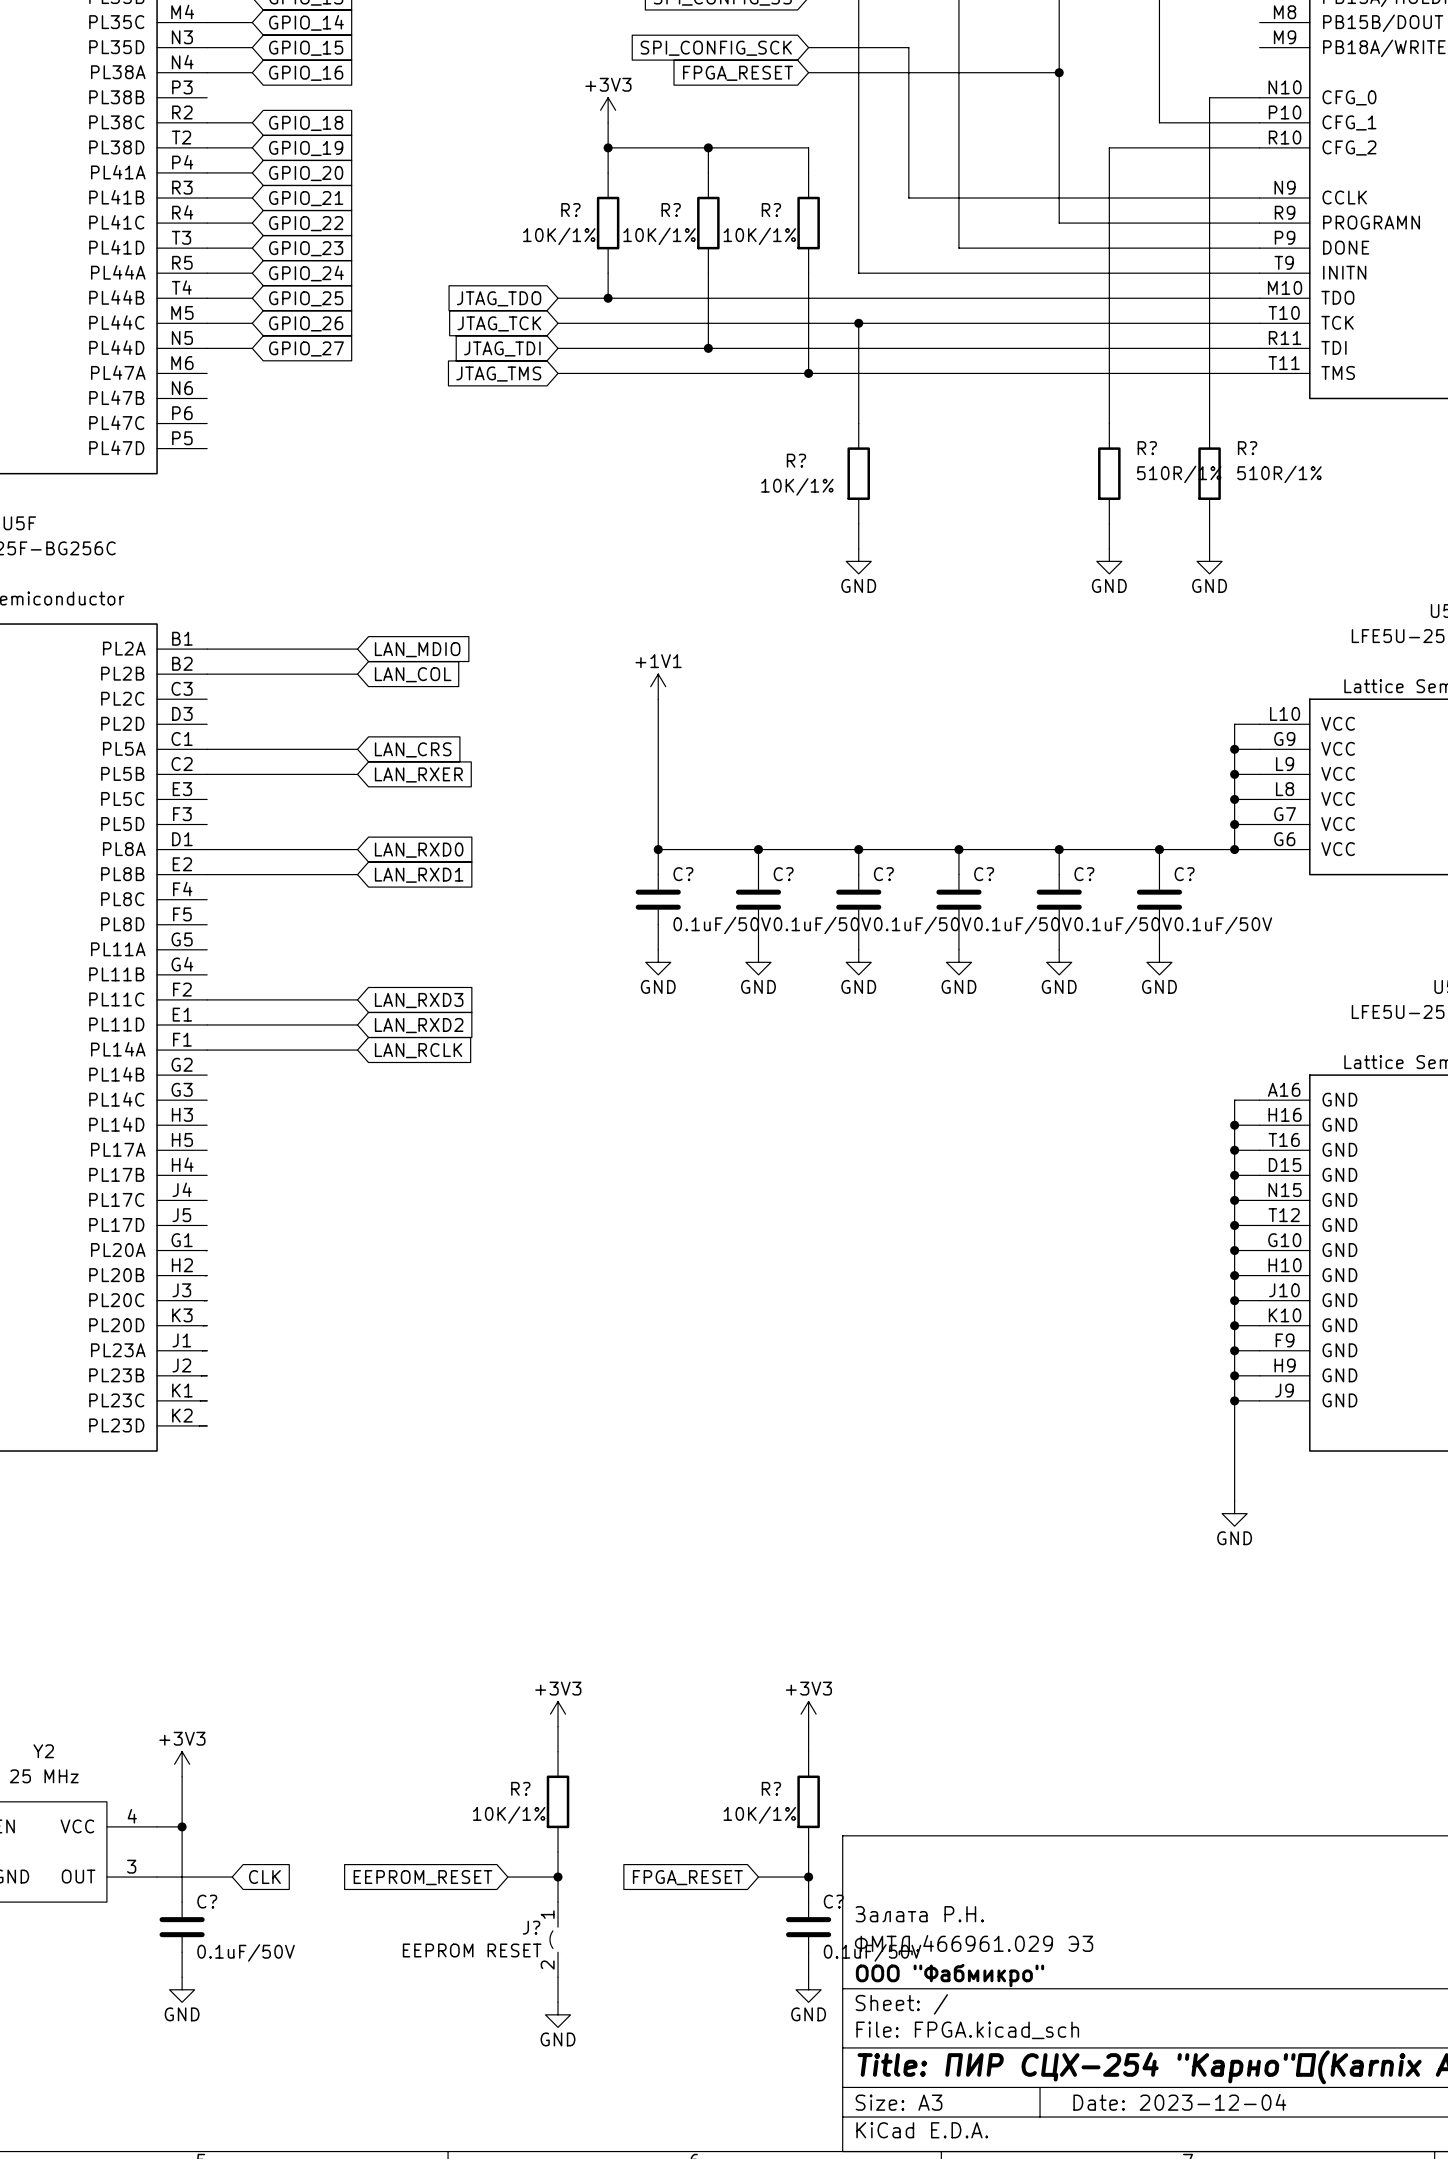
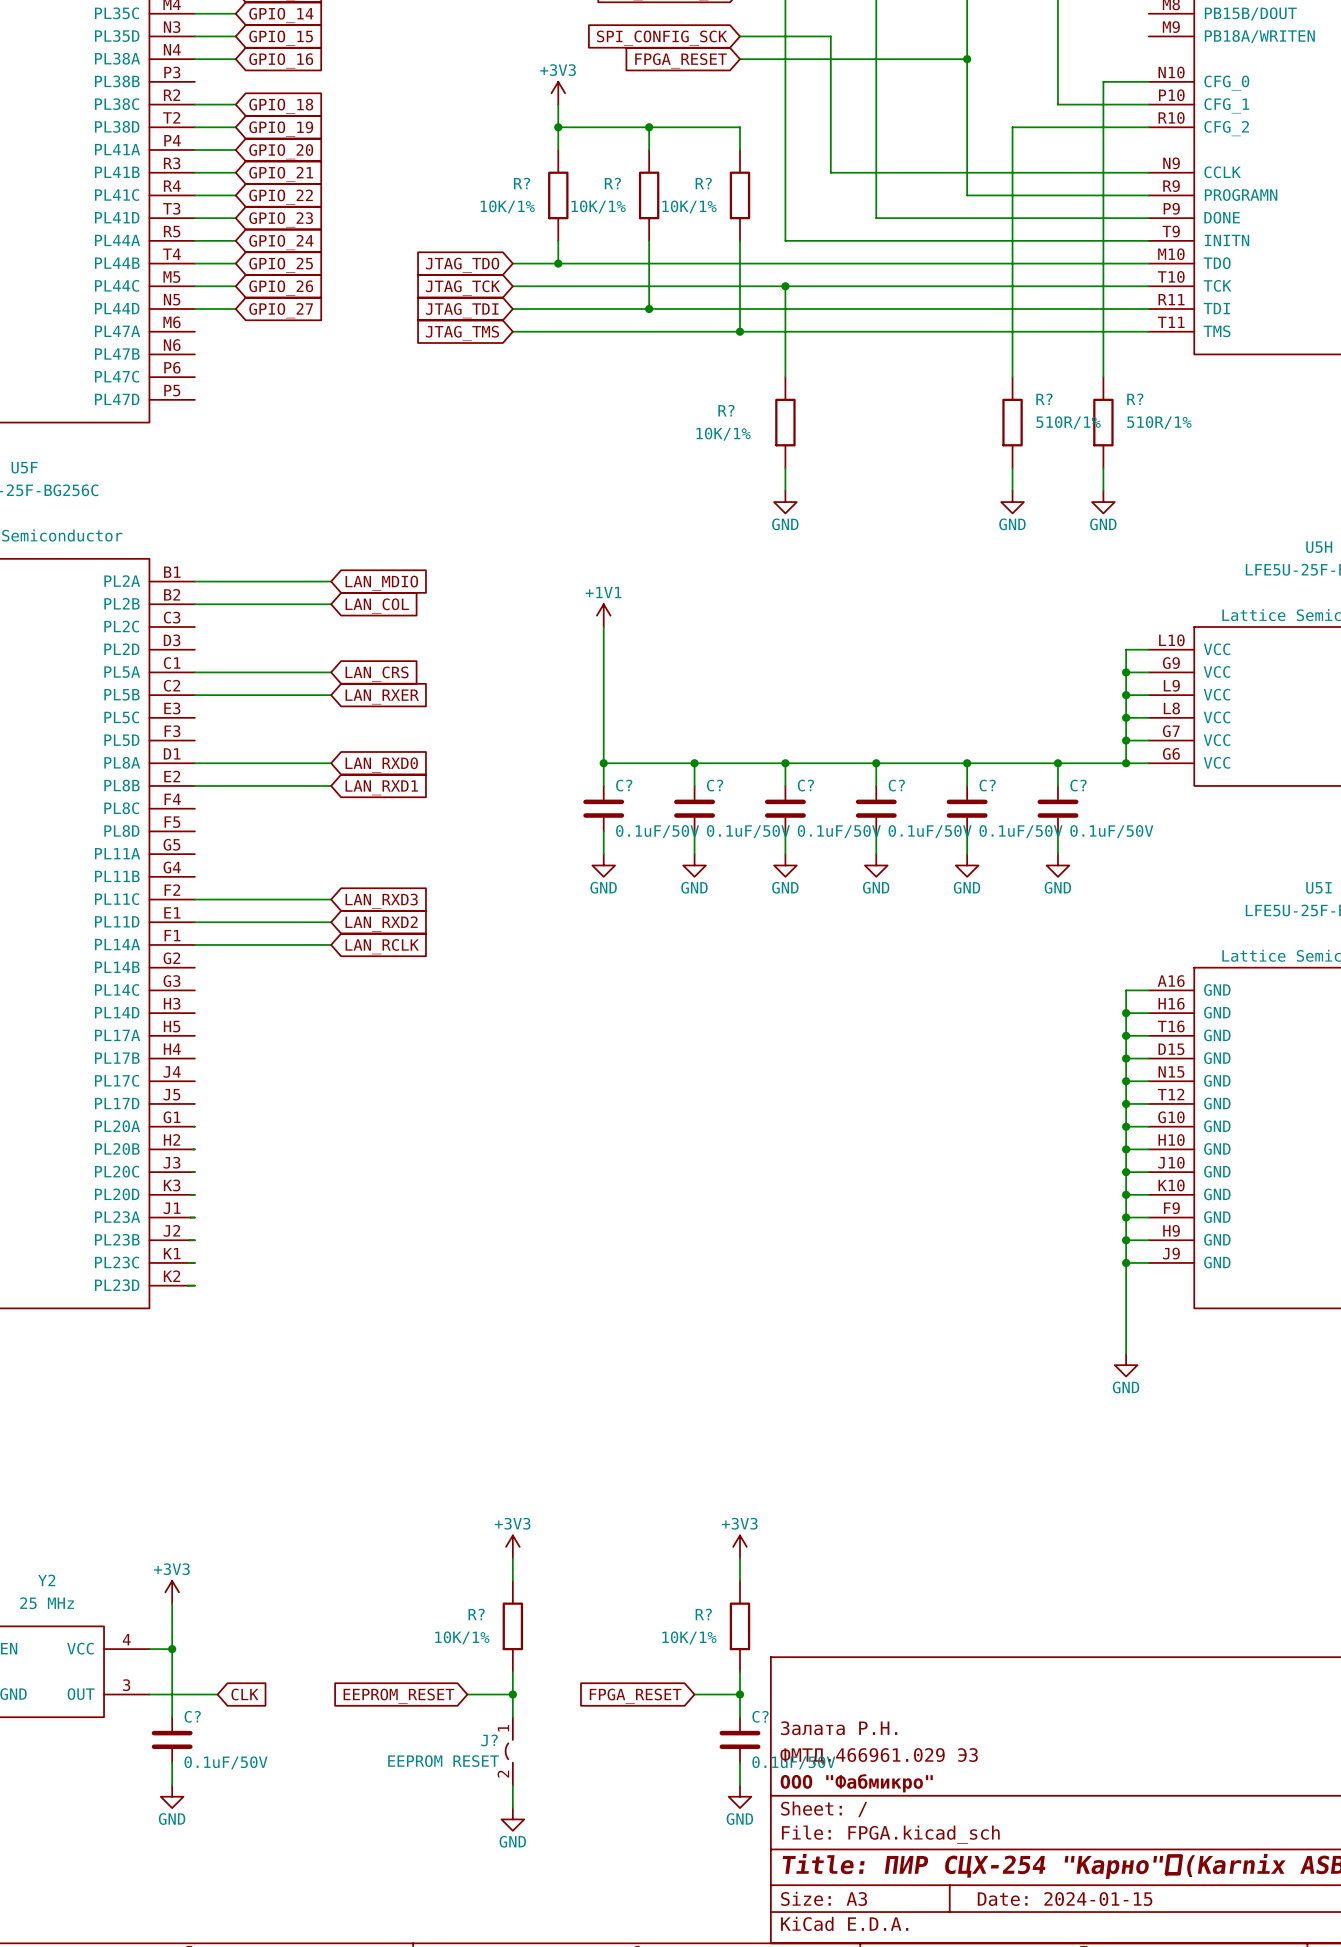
title block: Date: 2023-12-04 (1179, 2102) -> Date: 2024-01-15 (1065, 1899)

